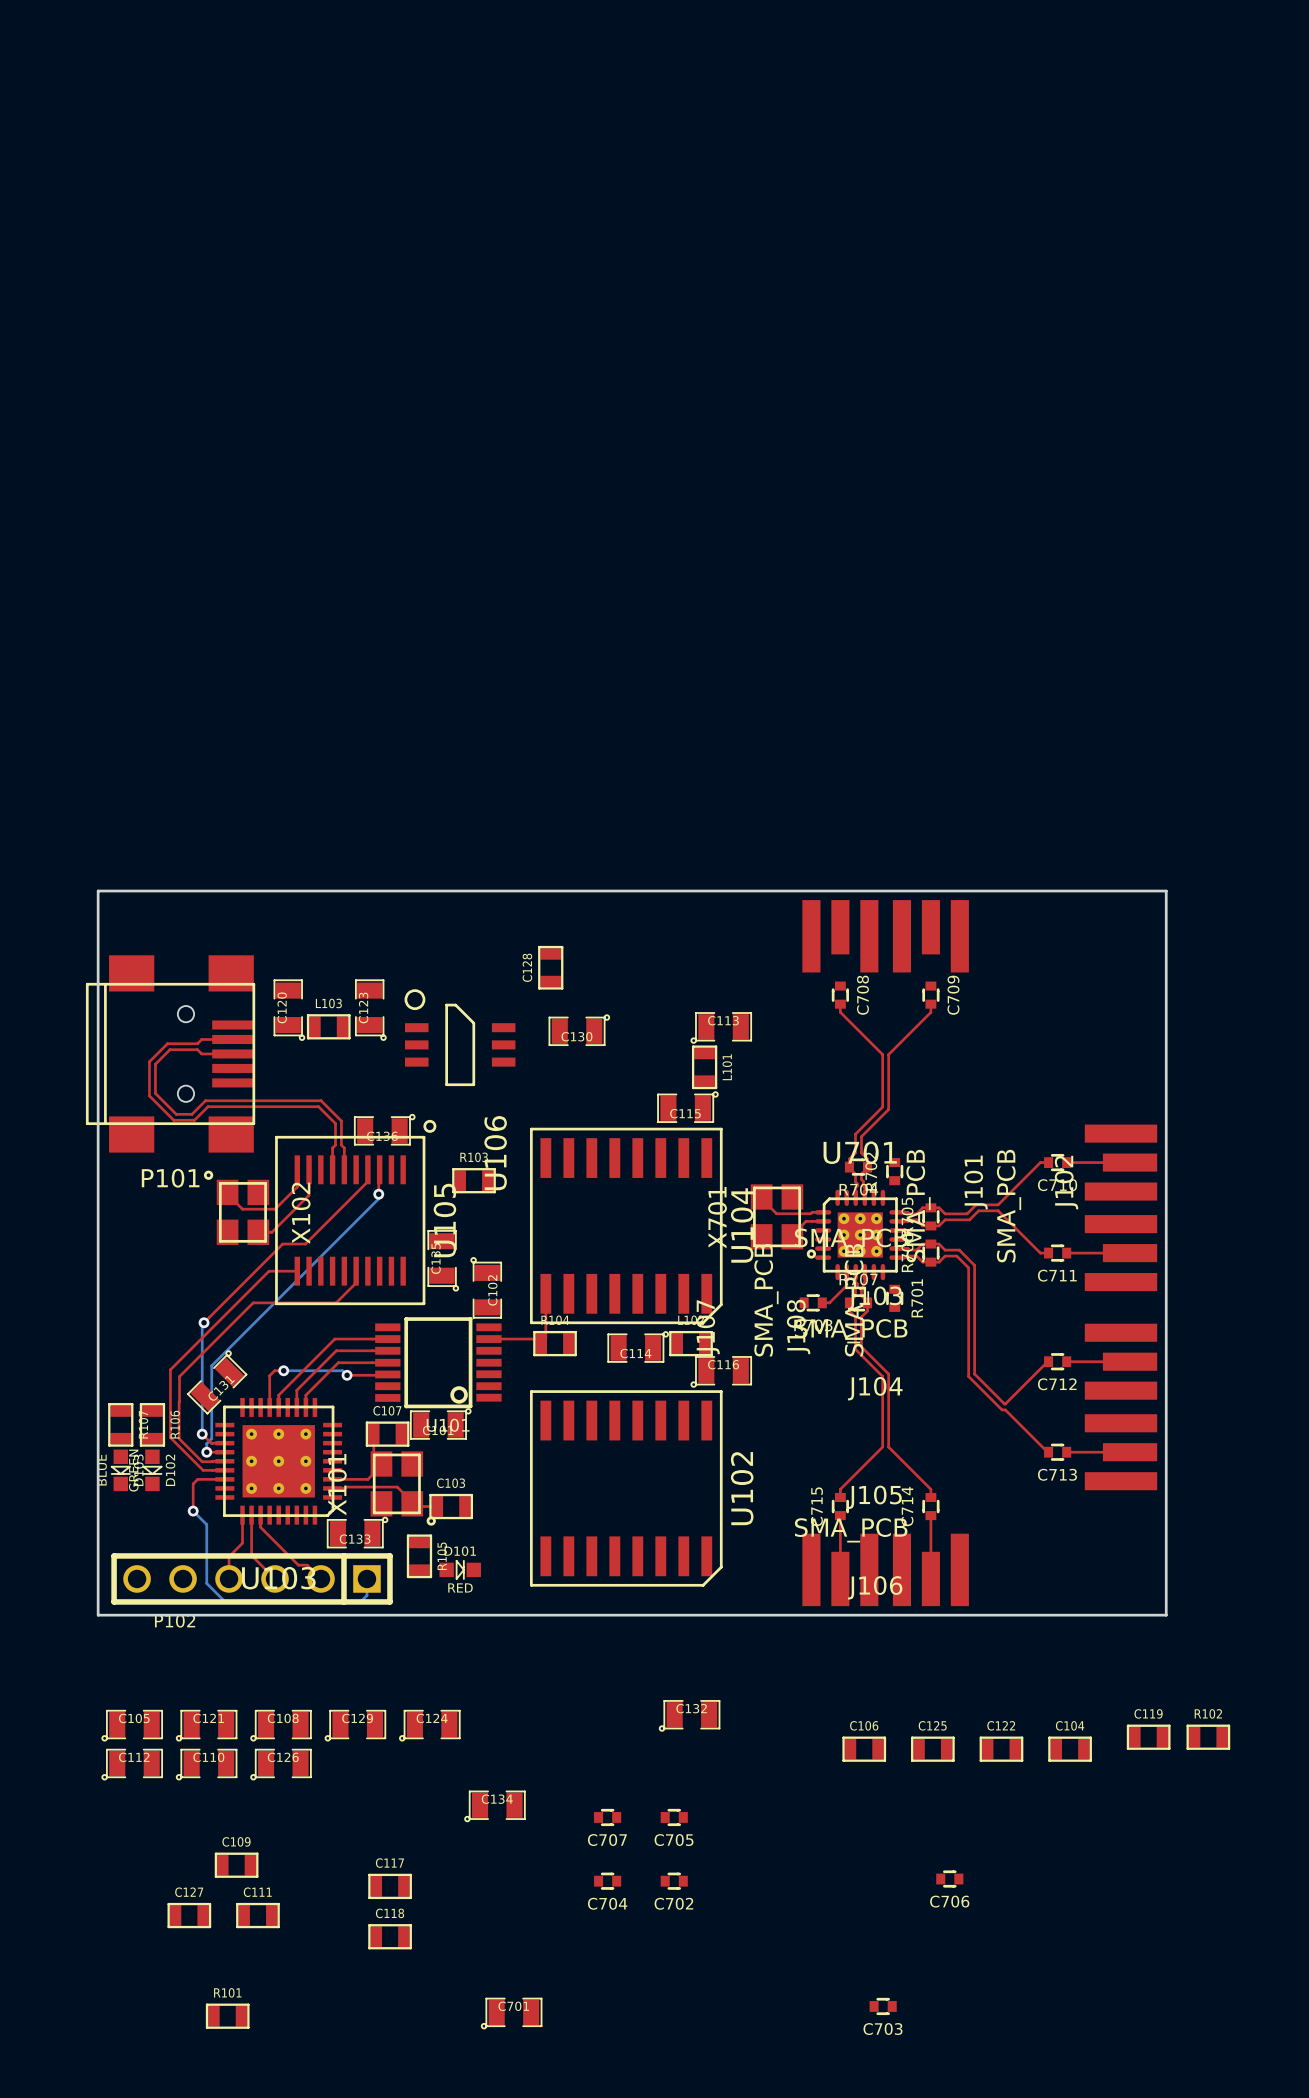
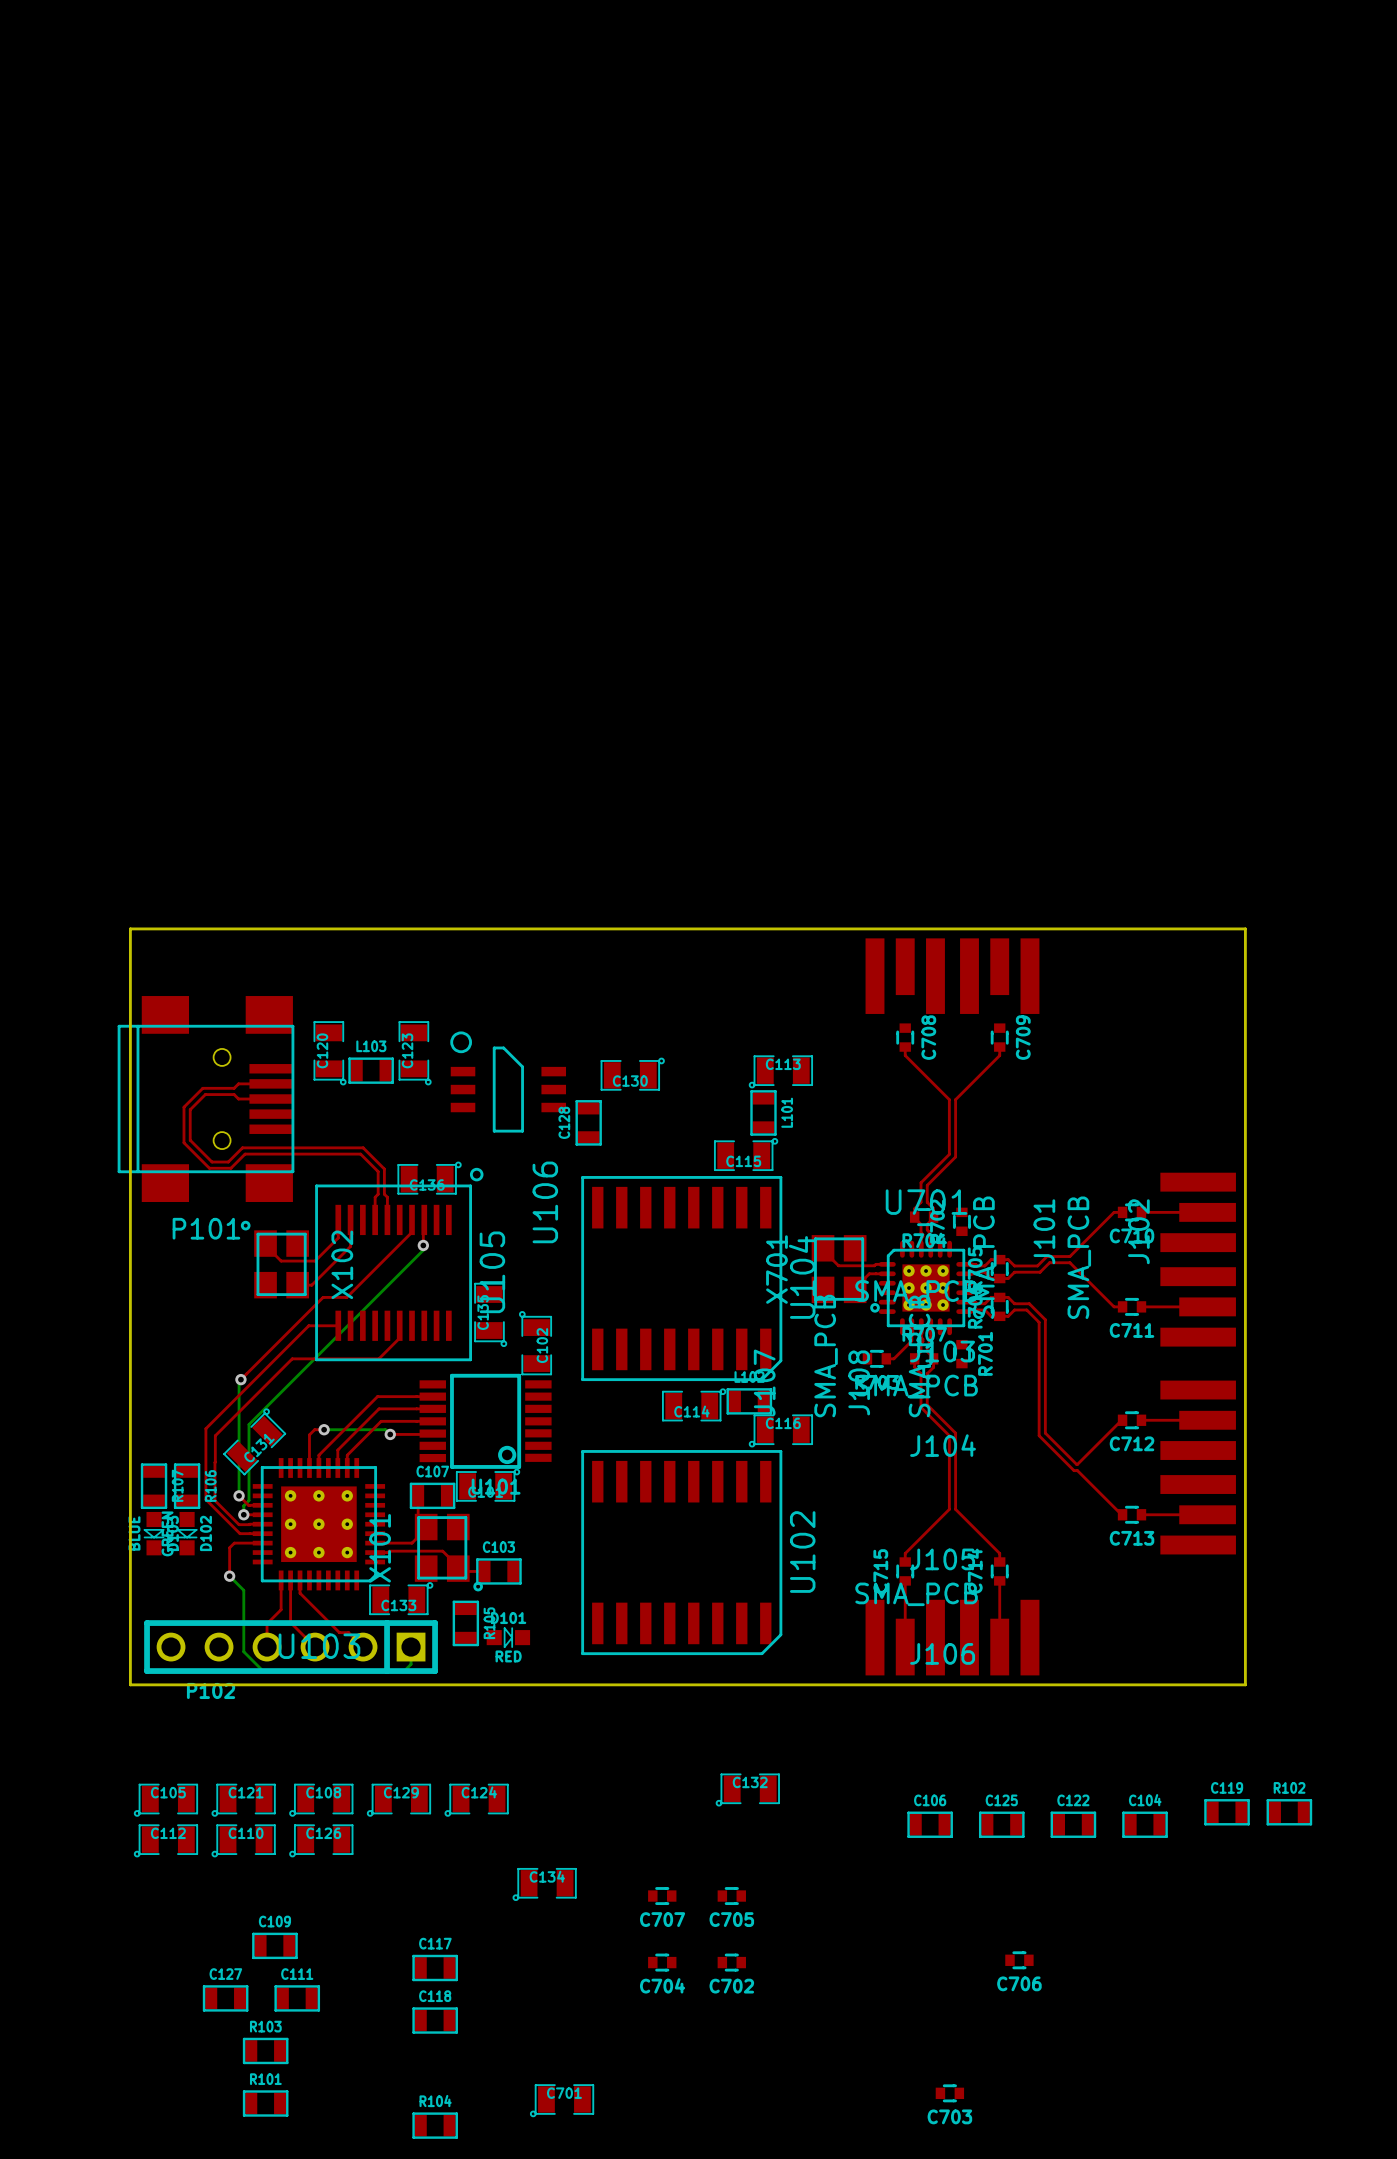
C128 position: (550, 967) -> (588, 1122)
R103 position: (474, 1180) -> (265, 2050)
top track: (545, 1293) (545, 1339) (541, 1343) (536, 1339) (488, 1339) -> none
R104 position: (555, 1343) -> (435, 2125)

